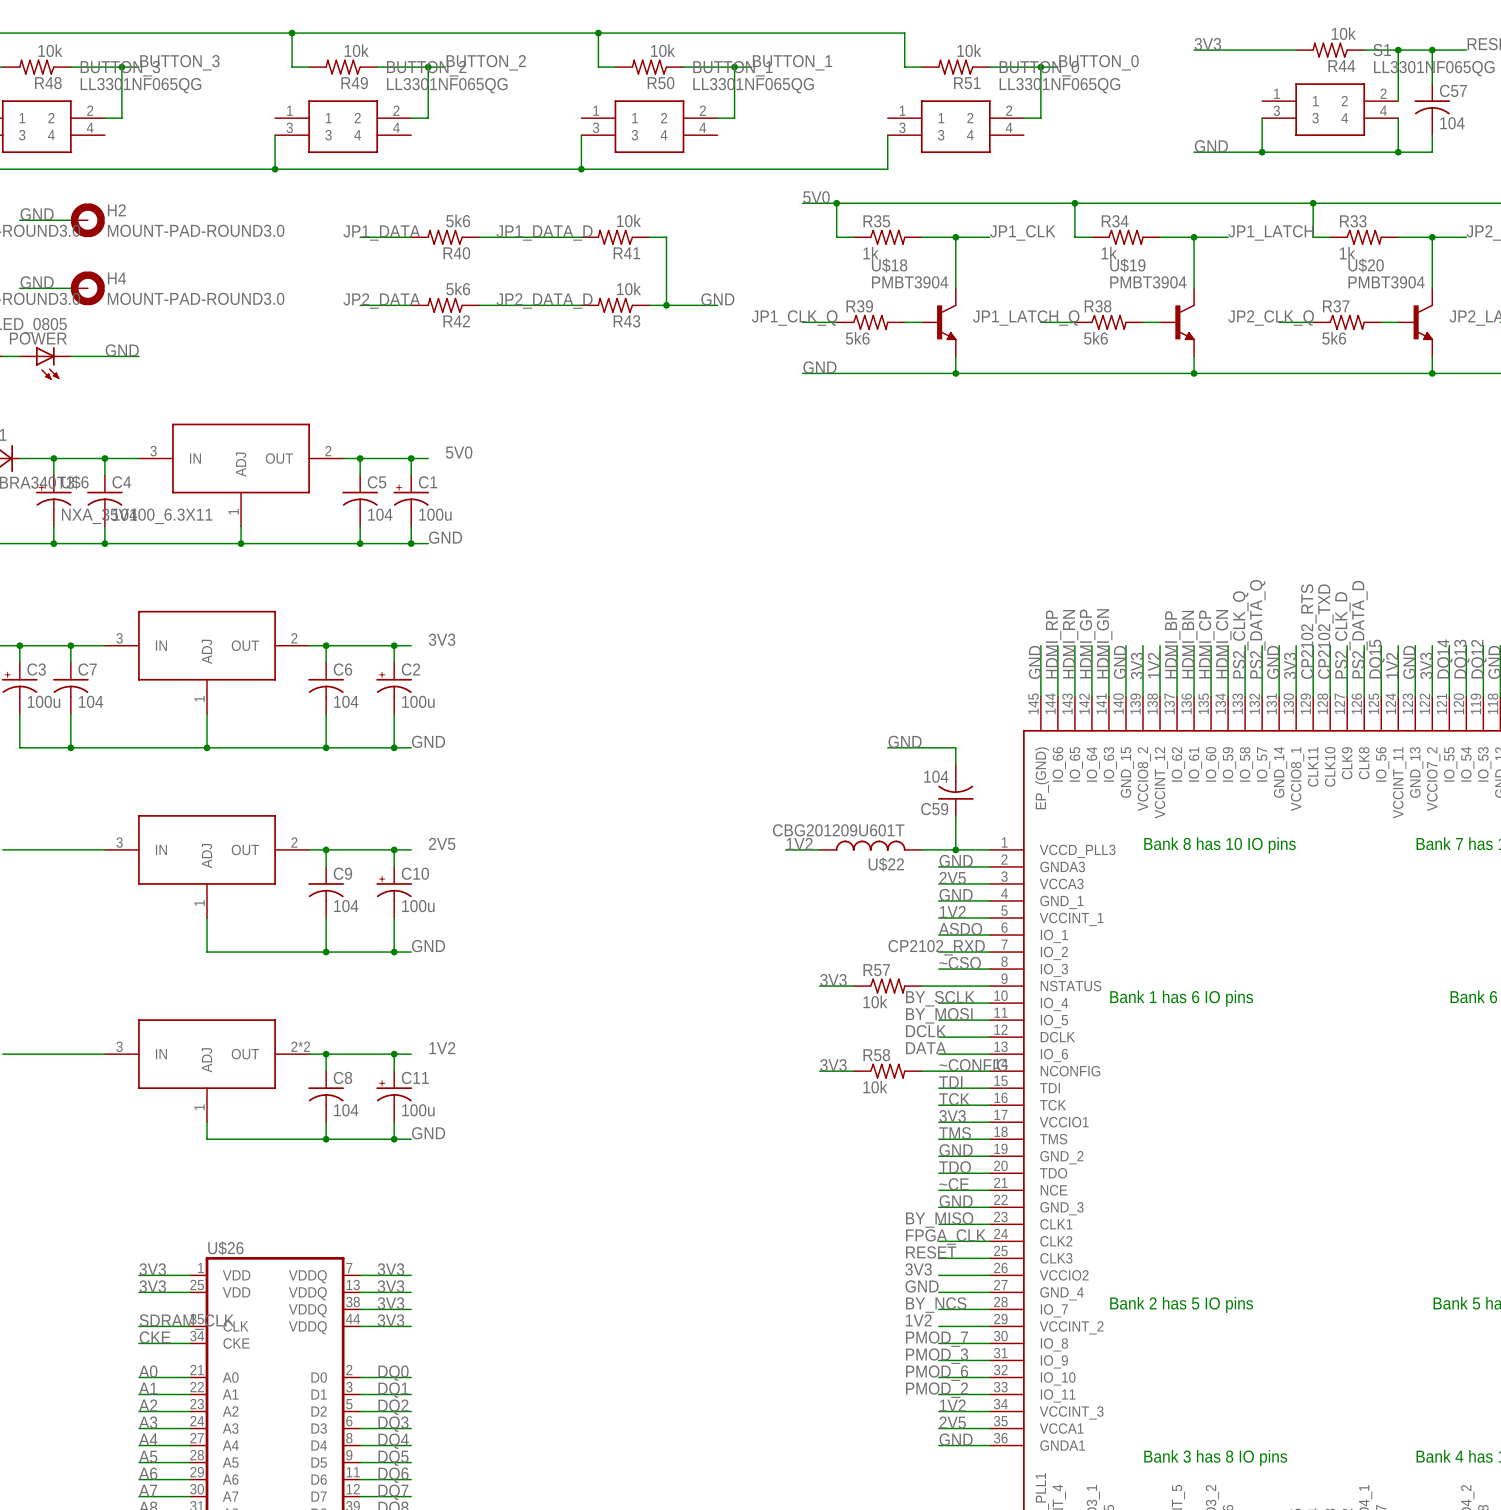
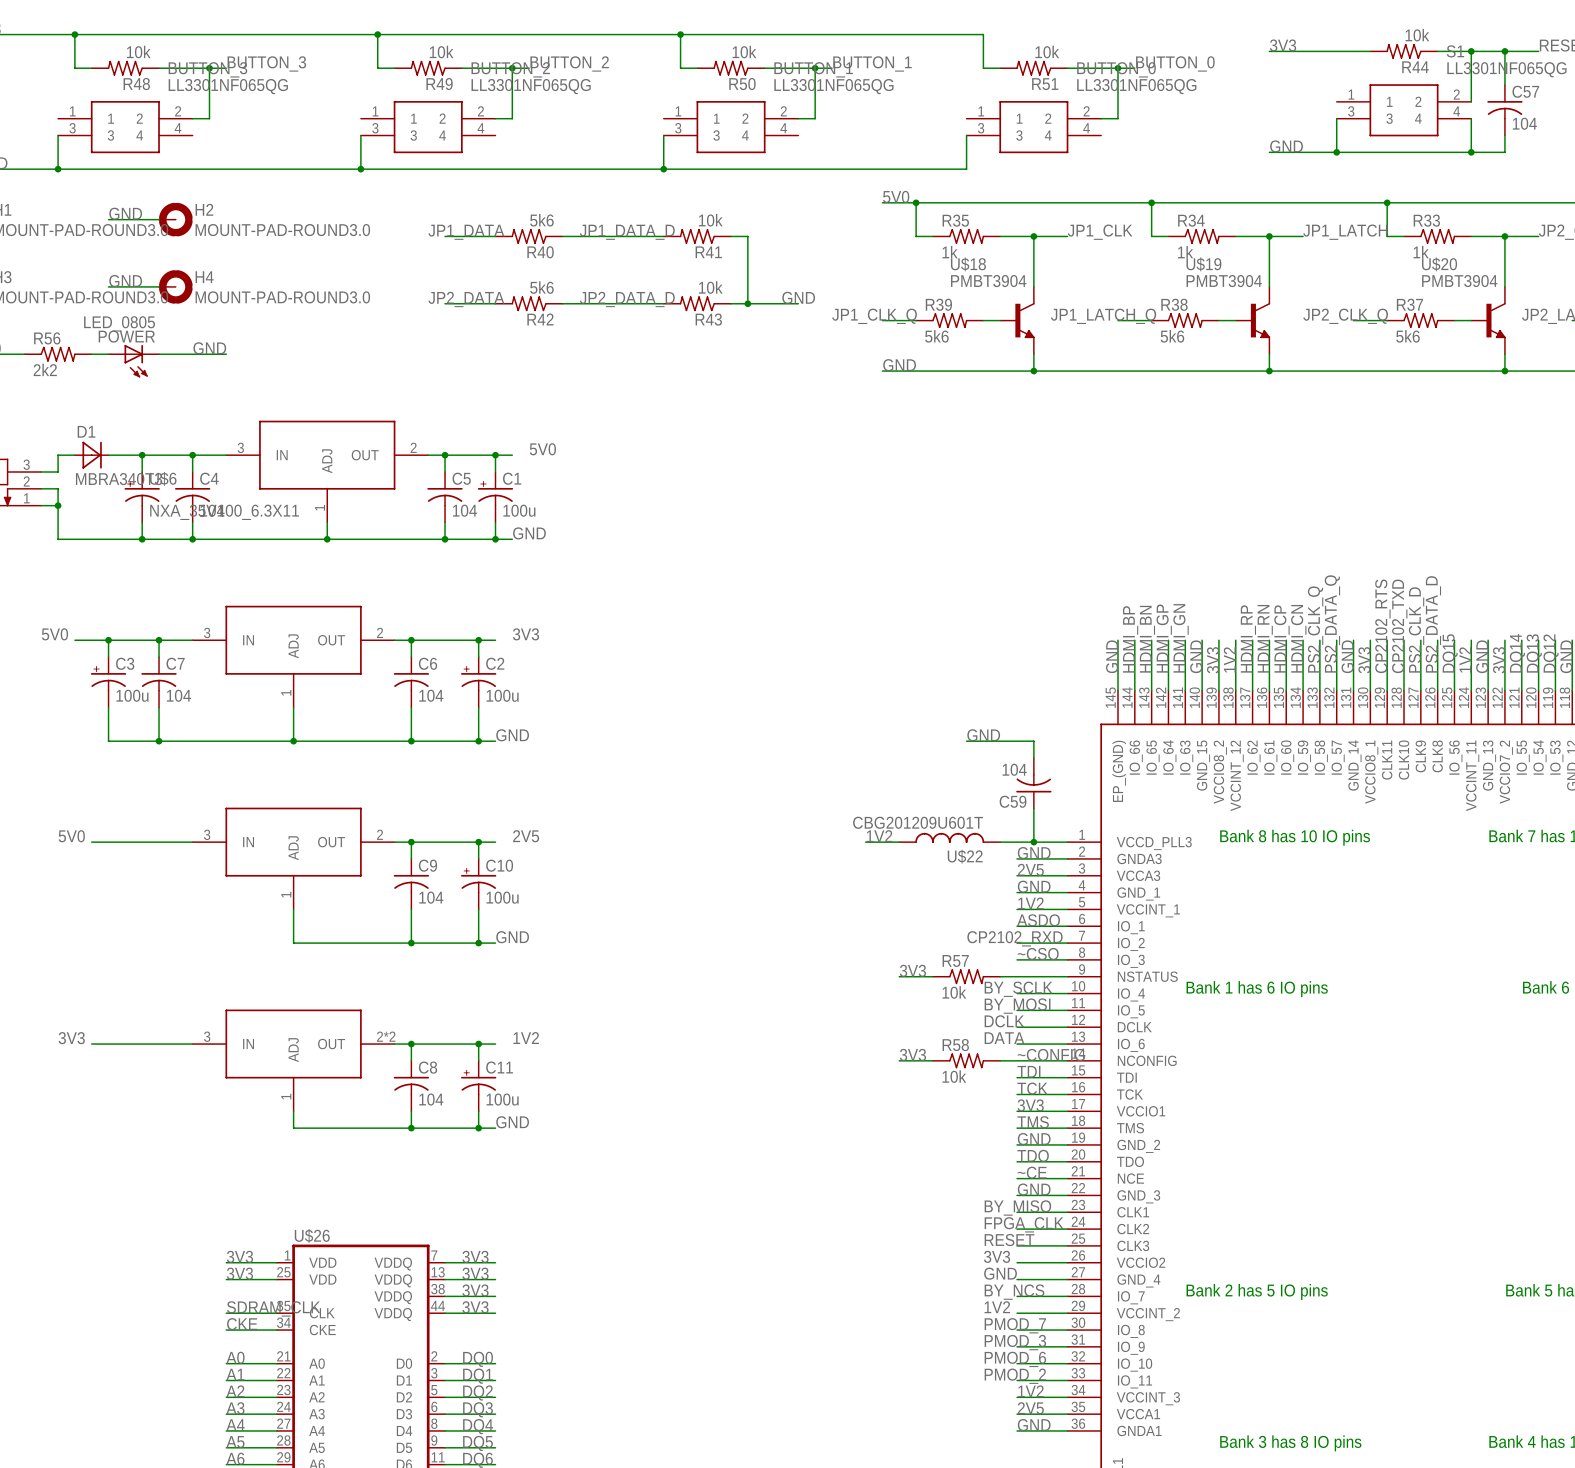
label: HDMI_RP (1053, 644) -> HDMI_BP (1130, 639)
label: HDMI_RN (1070, 644) -> HDMI_BN (1147, 639)
label: HDMI_BP (1172, 644) -> HDMI_RP (1248, 638)
label: HDMI_BN (1189, 644) -> HDMI_RN (1265, 638)

